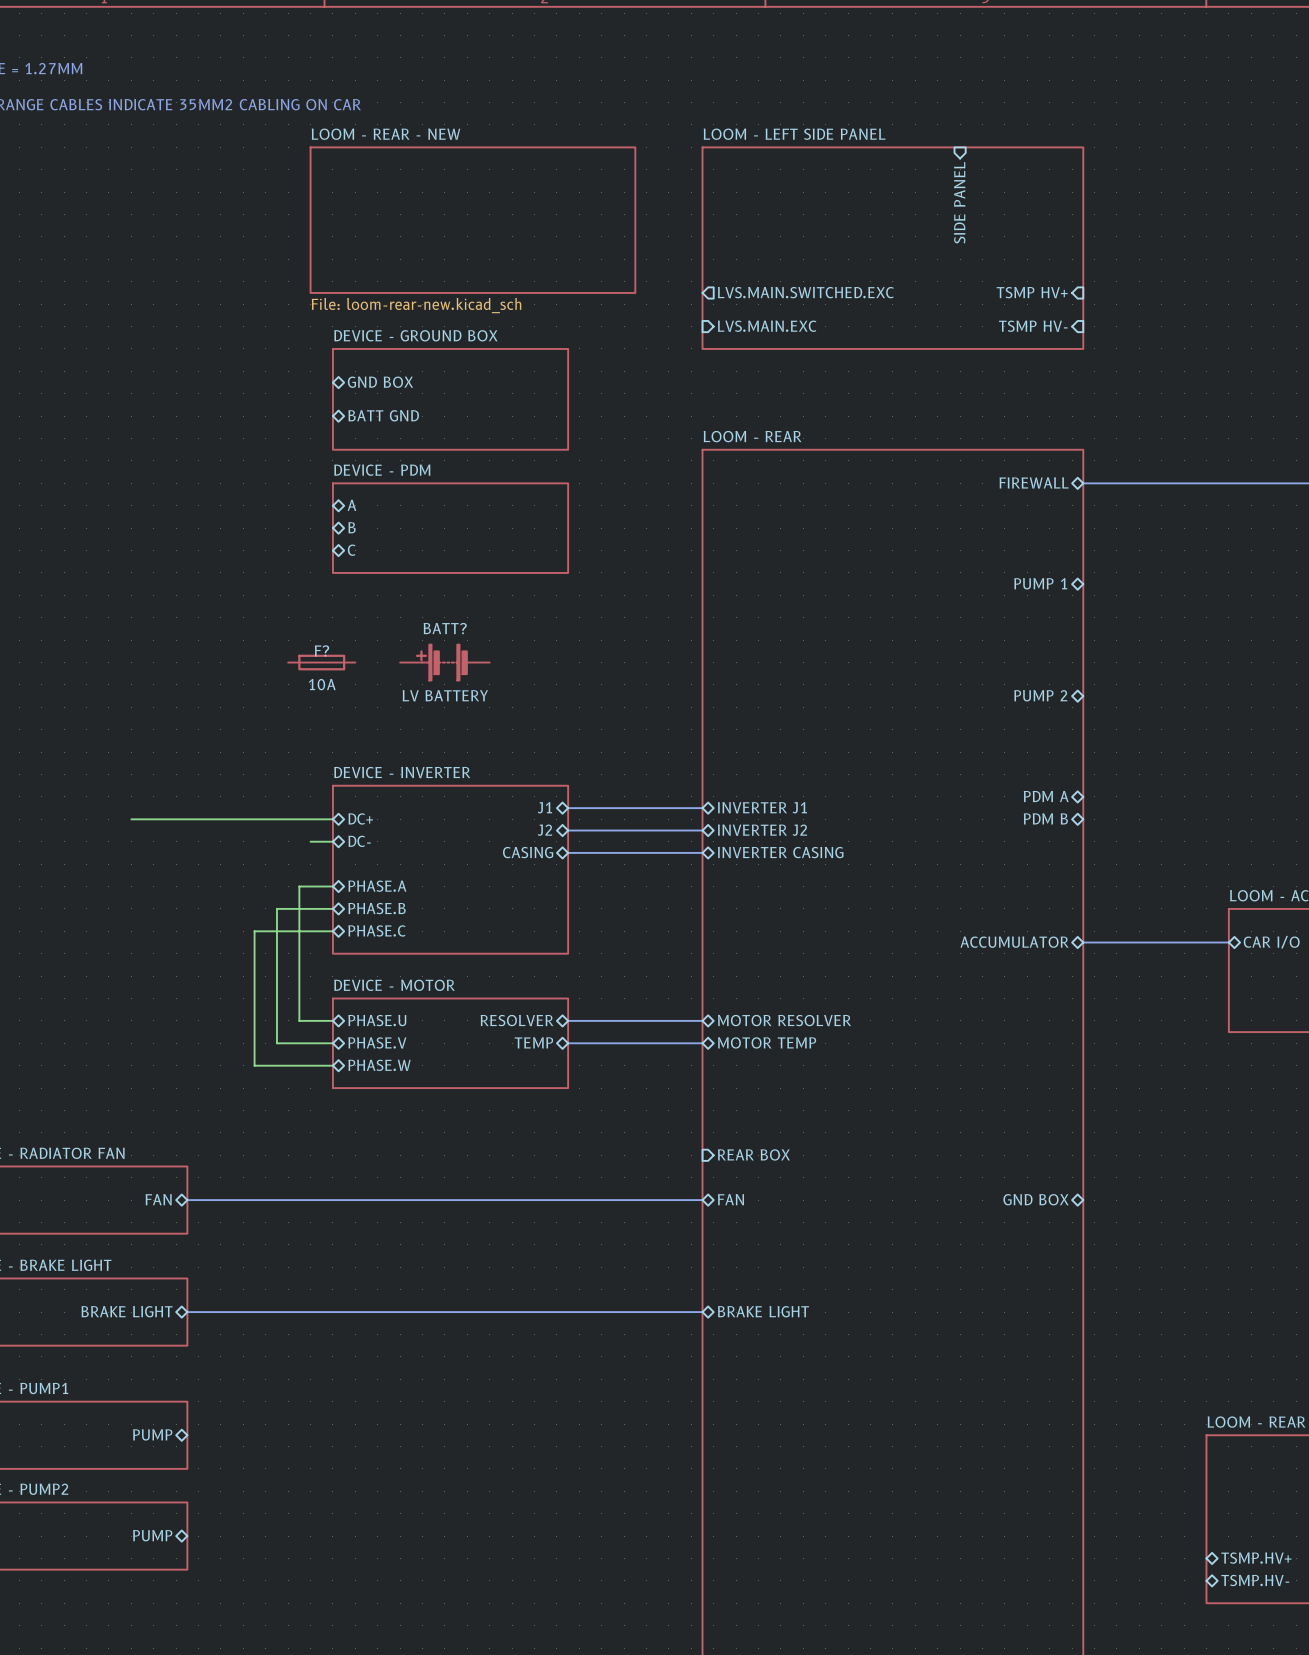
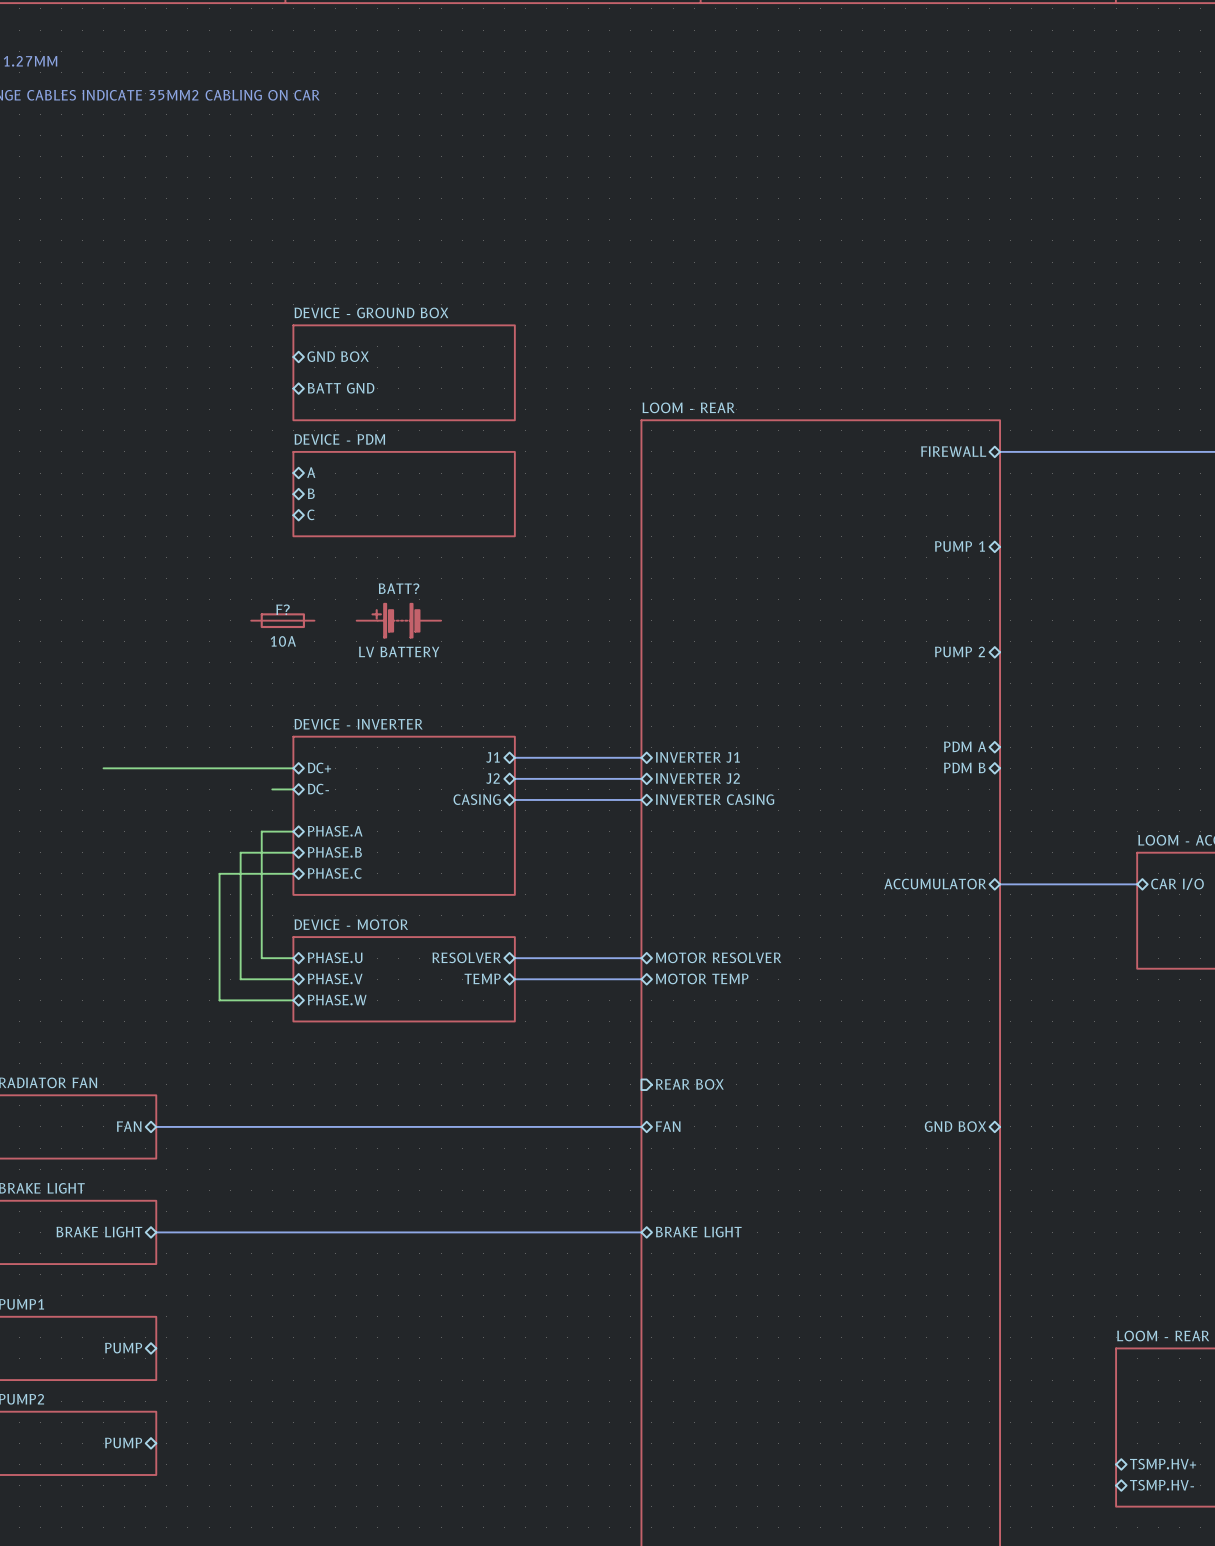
sheet pin: SIDE PANEL (959, 202) -> none
sheet LOOM - REAR - NEW: File: loom-rear-new.kicad_sch (472, 220) -> none
sheet LOOM - LEFT SIDE PANEL: (892, 248) -> none
sheet pin: LVS.MAIN.SWITCHED.EXC (805, 292) -> none
sheet pin: TSMP HV+ (1032, 292) -> none
sheet pin: LVS.MAIN.EXC (767, 326) -> none
sheet pin: TSMP HV- (1033, 326) -> none

